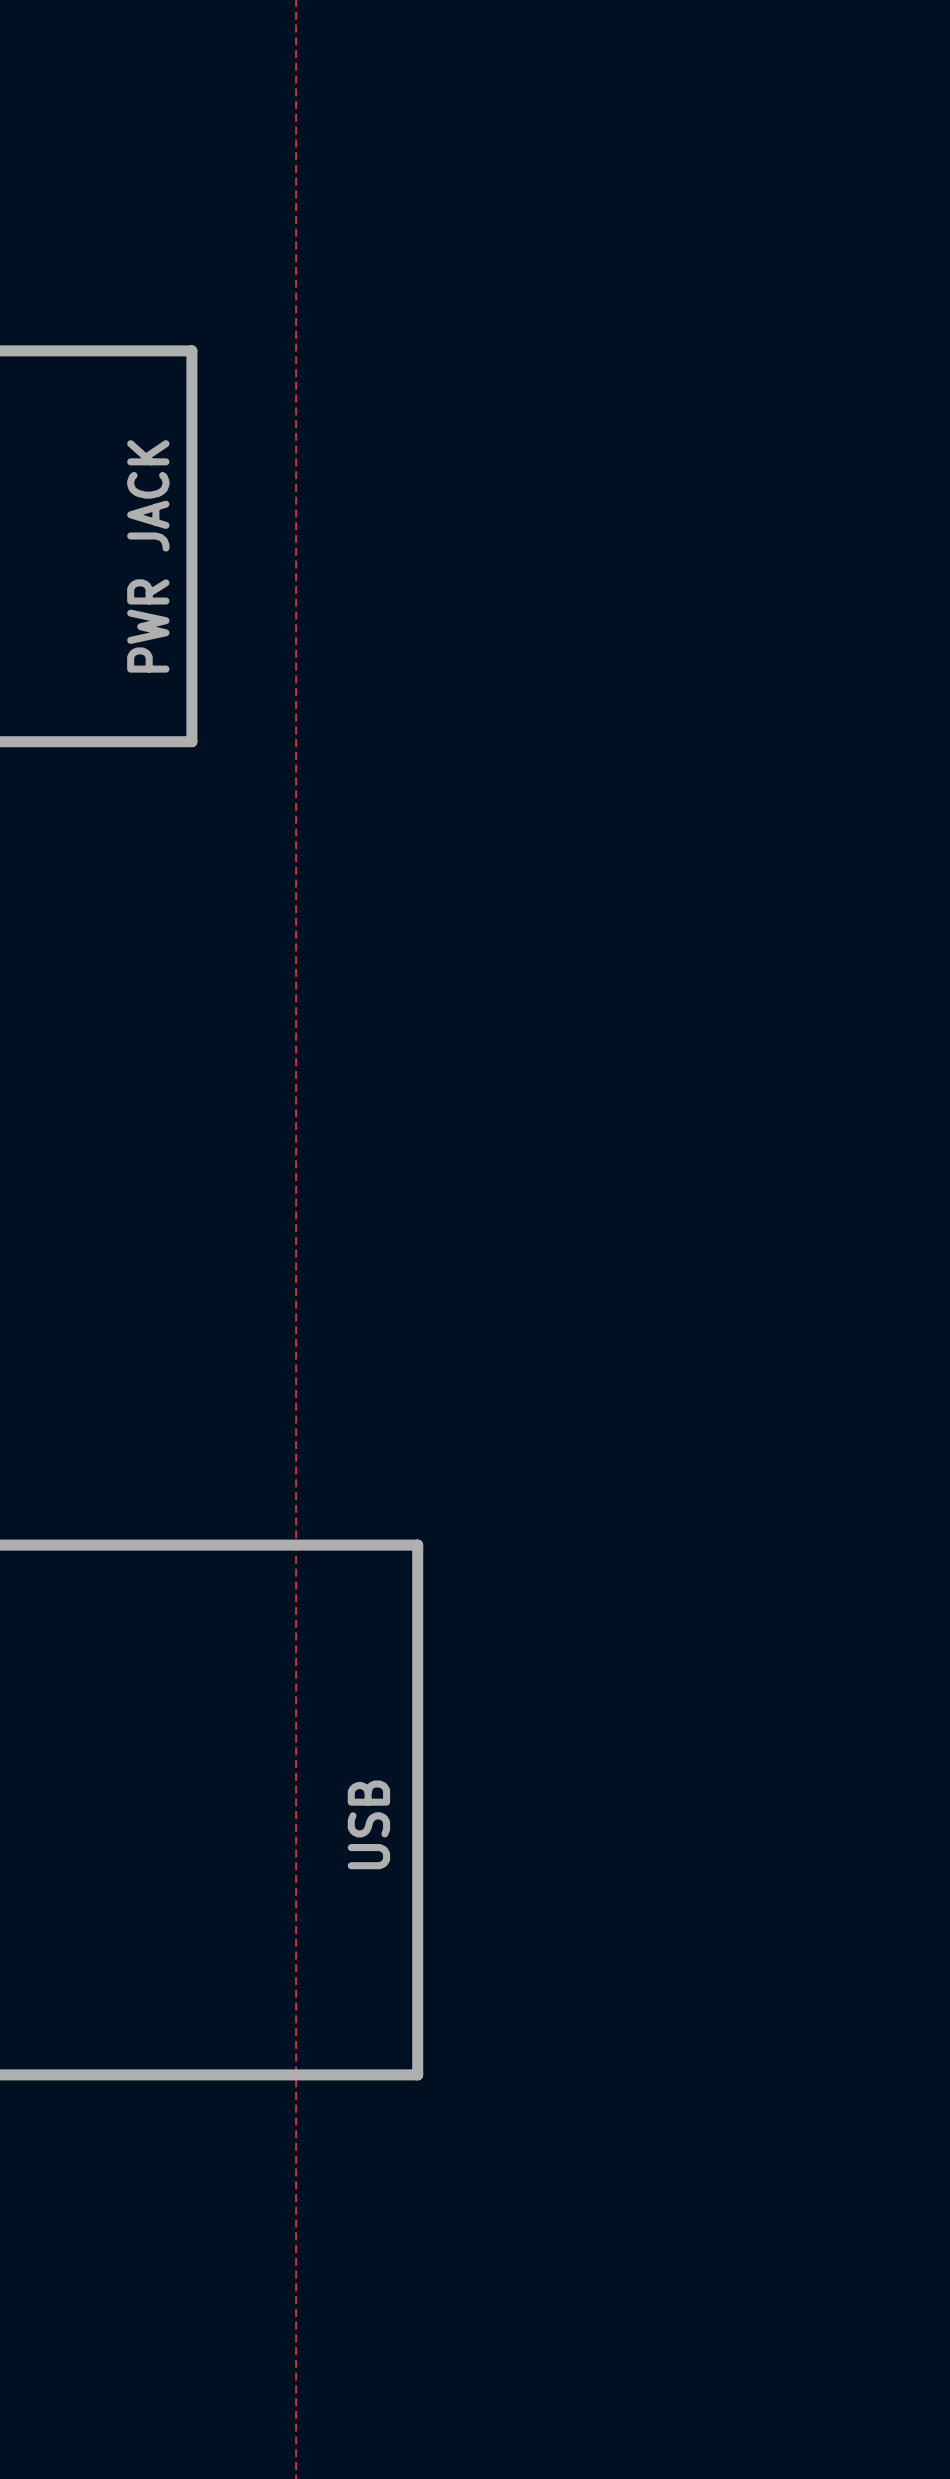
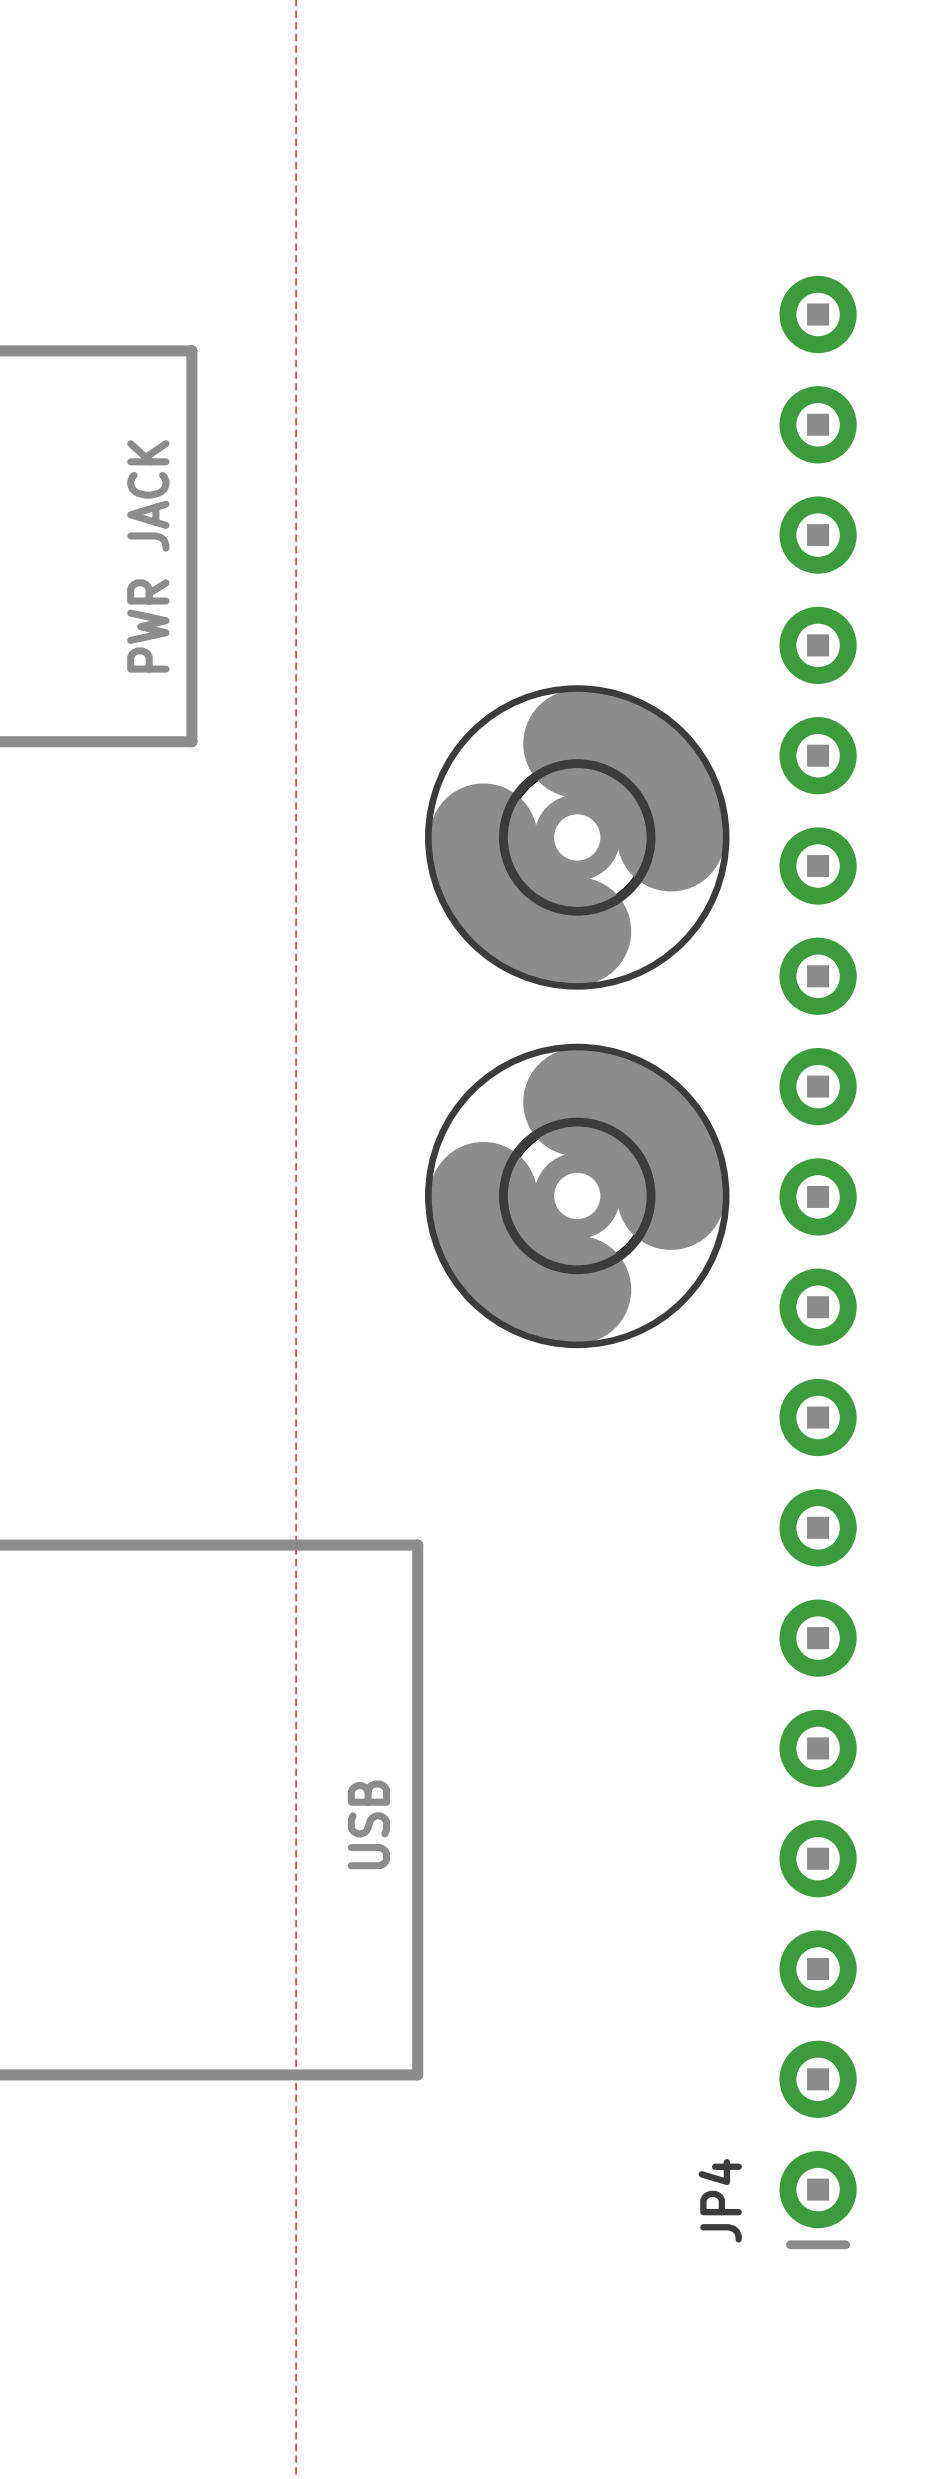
part: none -> (577, 837)
part: none -> (577, 1195)
JP4: none -> (818, 1262)

